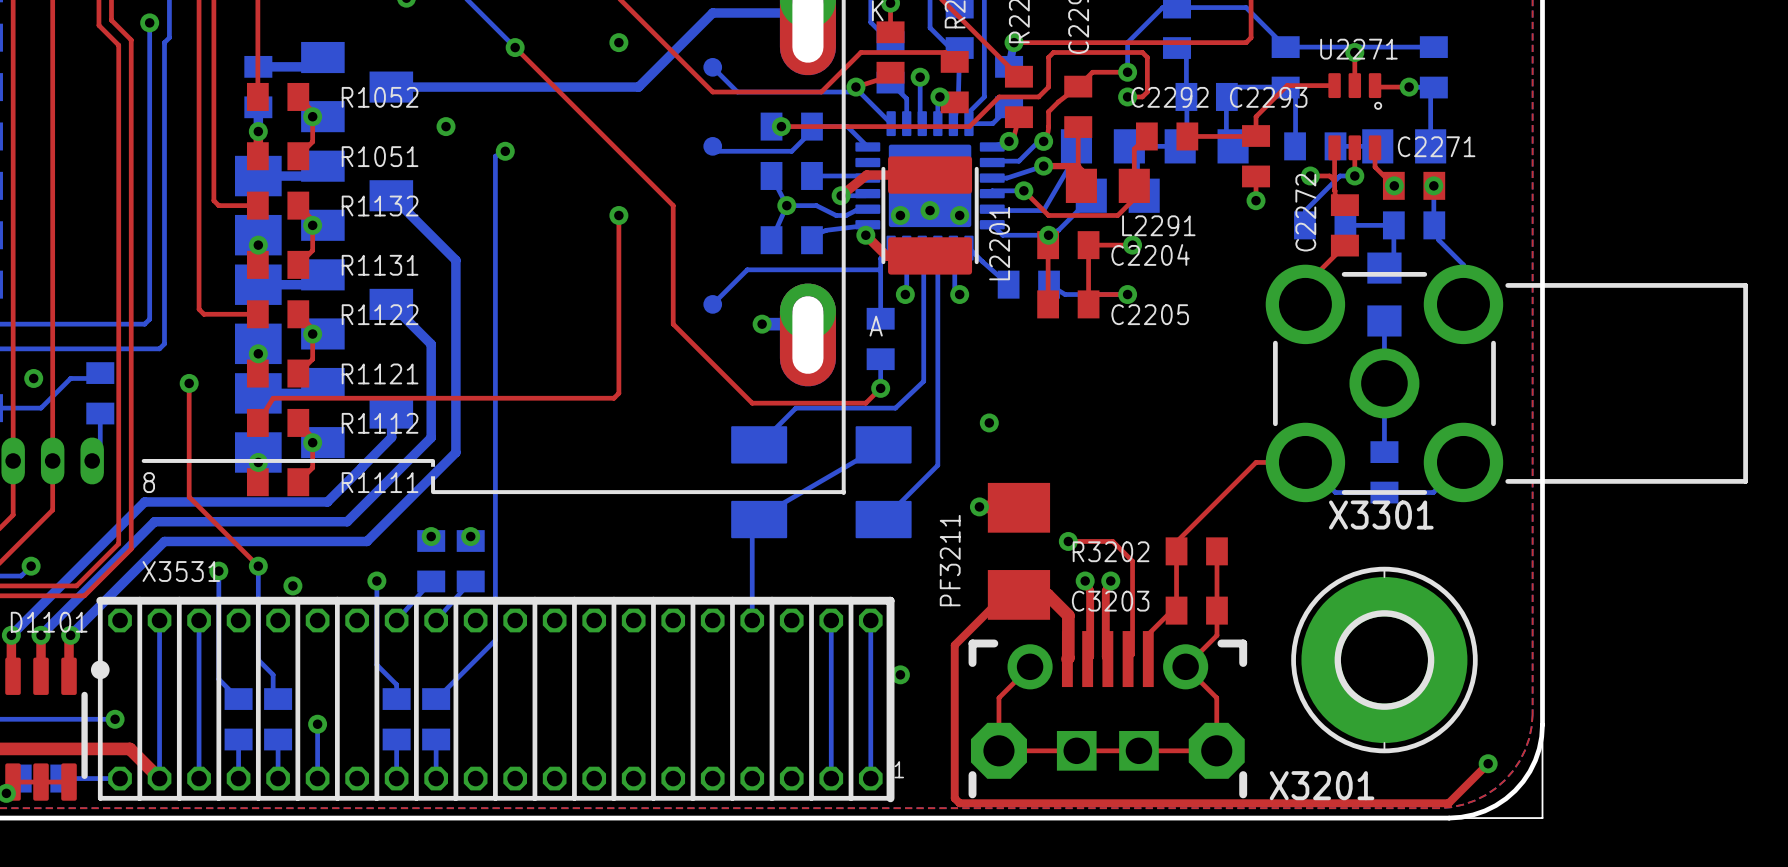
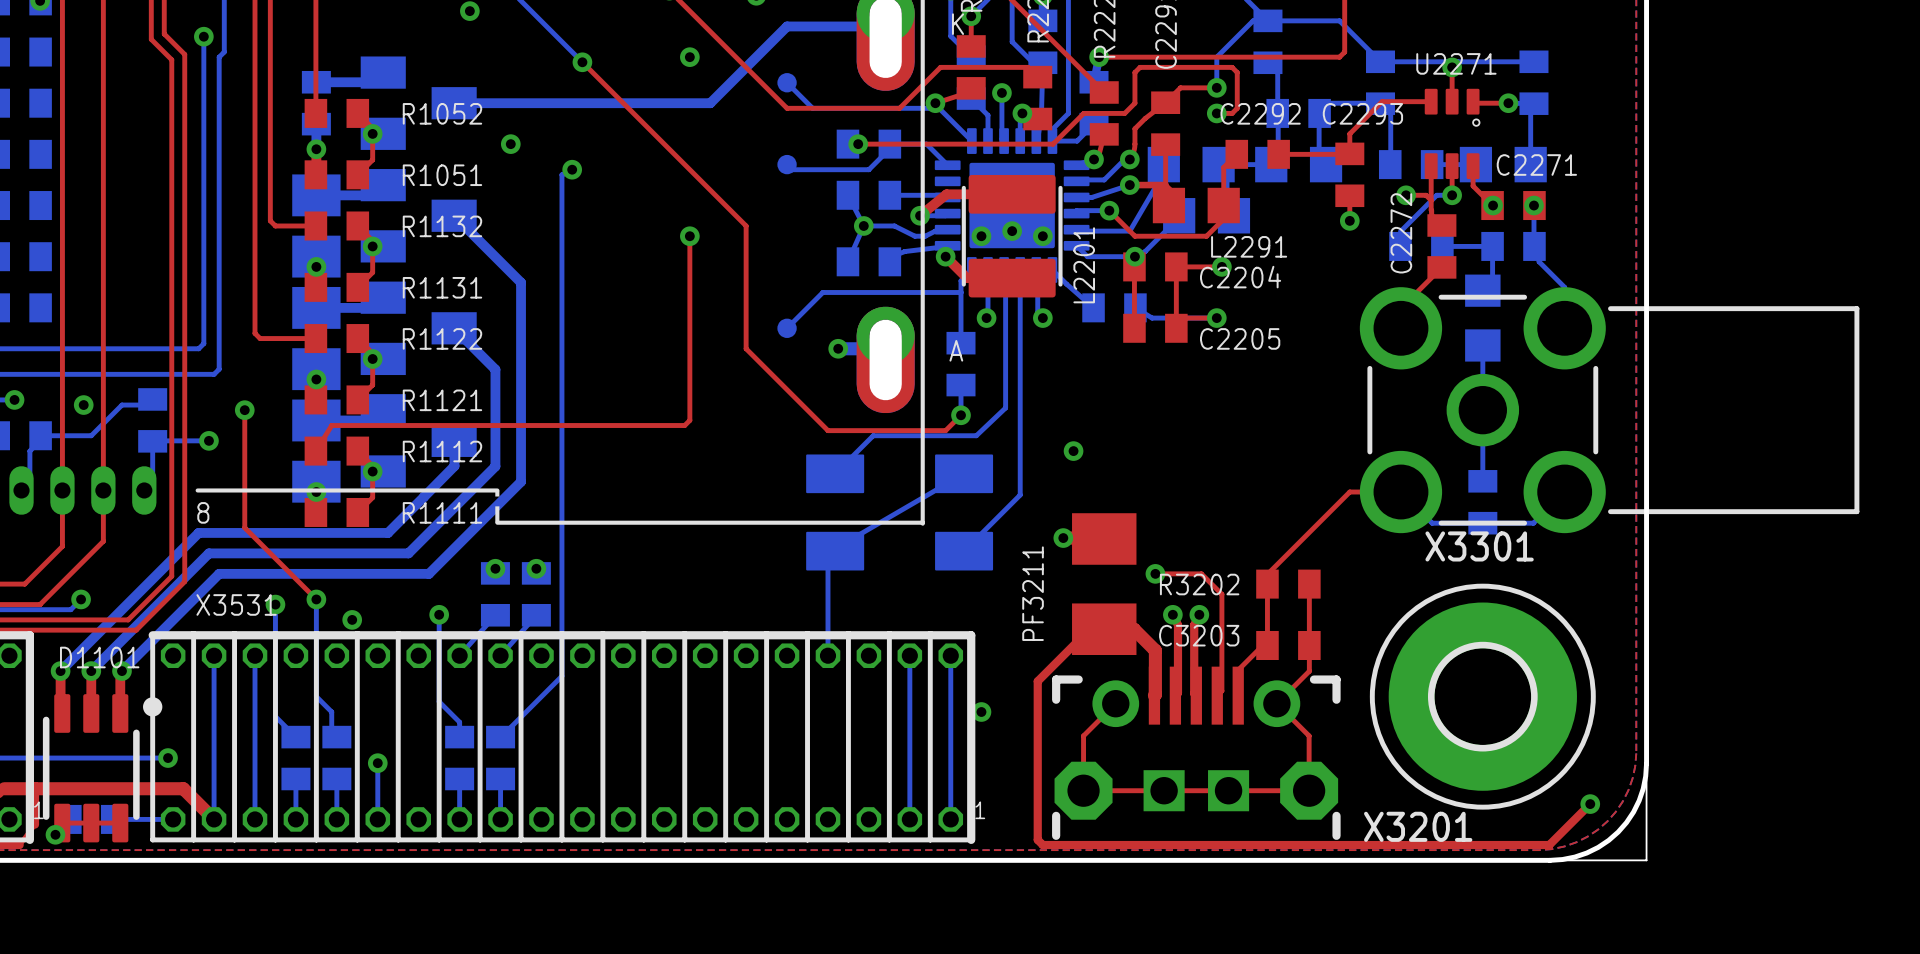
bottom track: none -> (208, 440) (152, 441)
via: none -> (208, 440)
part footprint: [1291, 566, 1478, 754] -> [1369, 583, 1596, 810]

